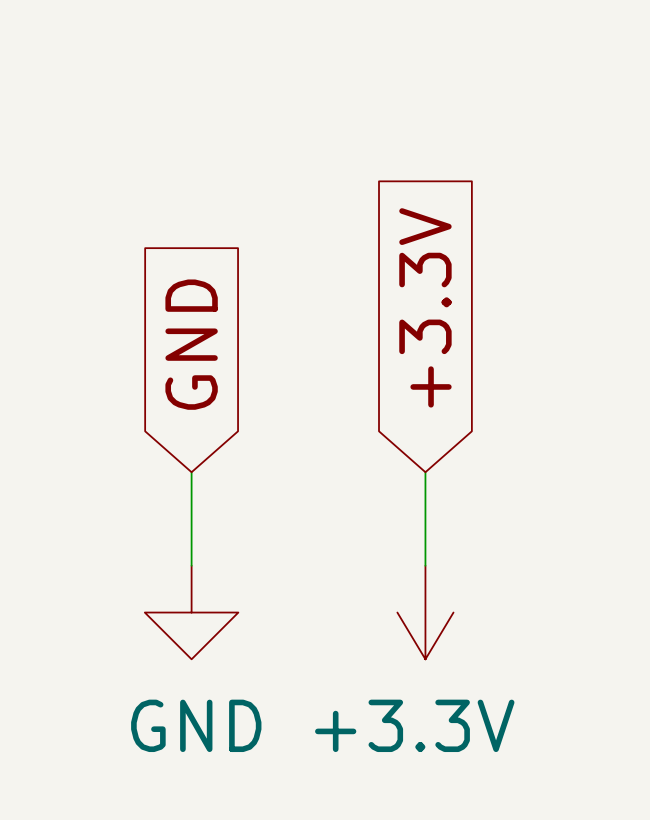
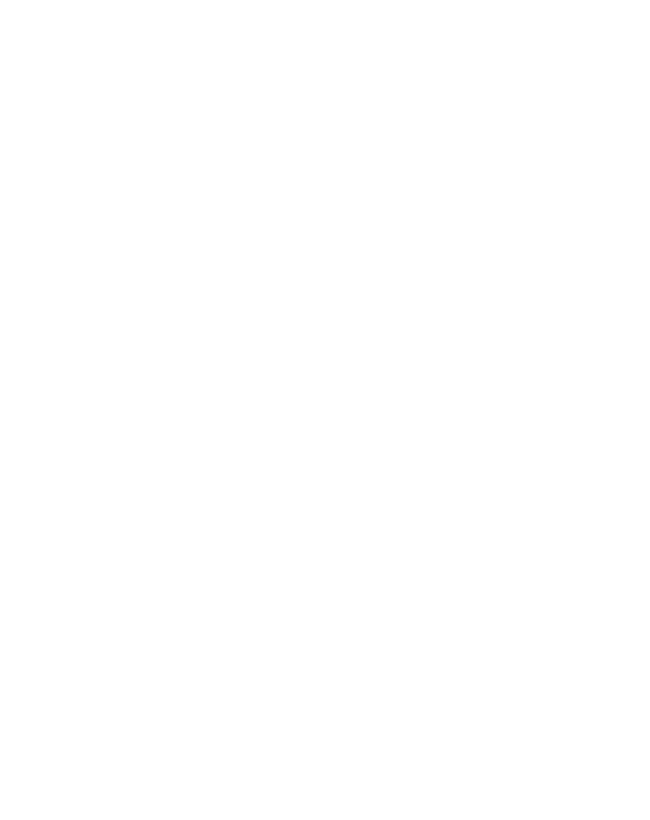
global label: +3.3V (425, 307) -> none
global label: GND (191, 344) -> none
wire: (191, 472) (191, 565) -> none
wire: (425, 472) (425, 565) -> none
power symbol: GND (191, 612) -> none
power symbol: +3.3V (425, 612) -> none

